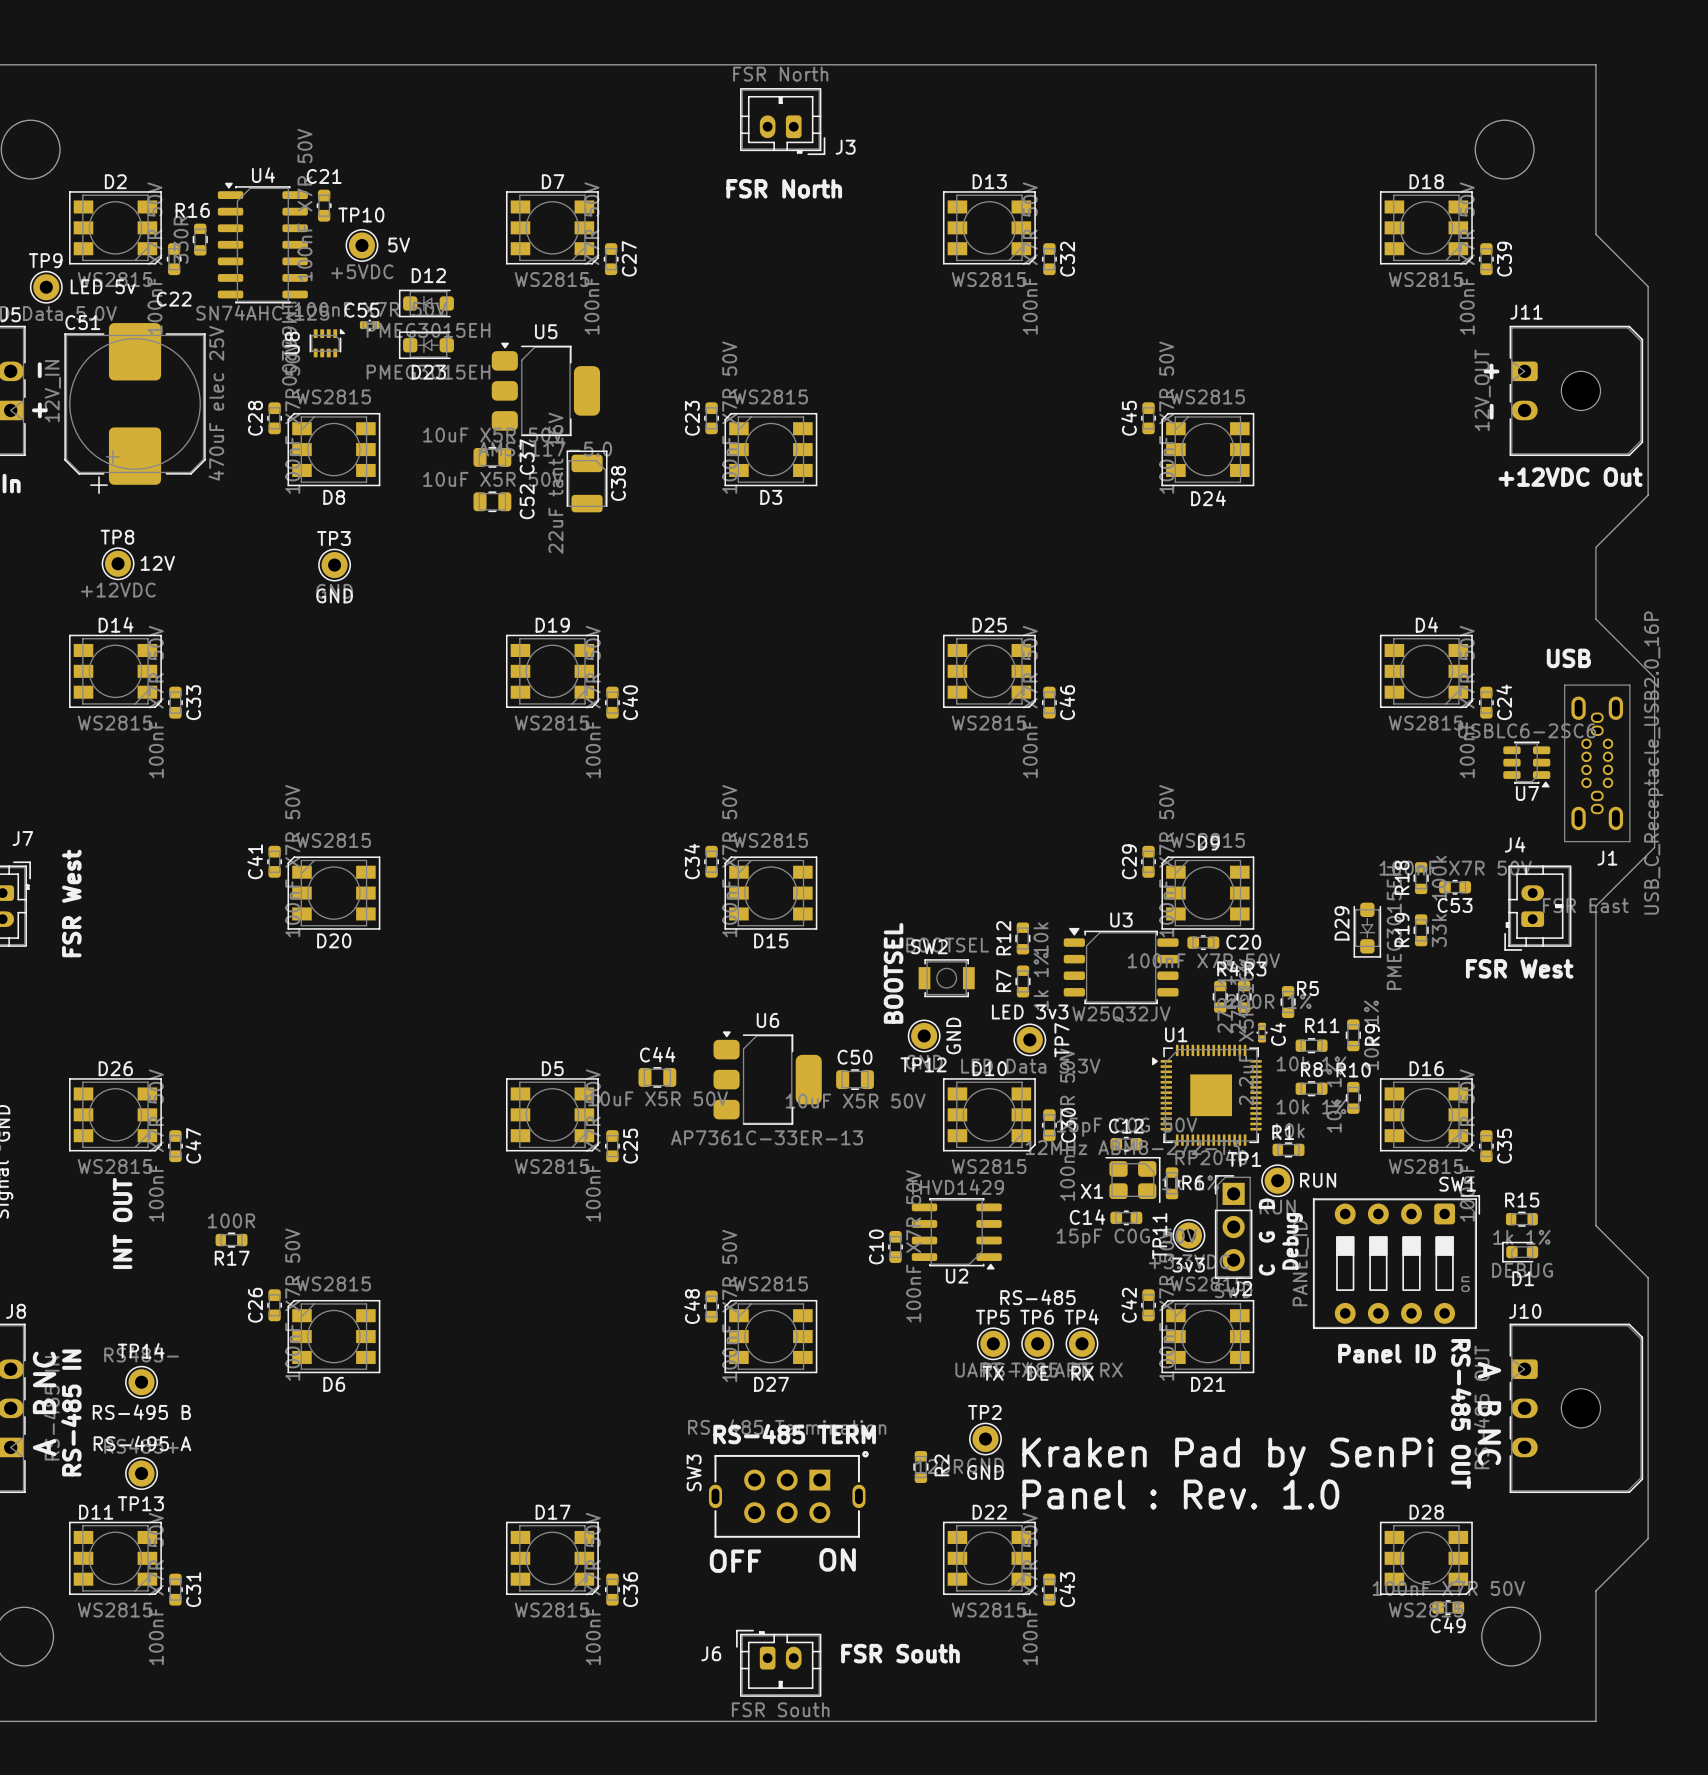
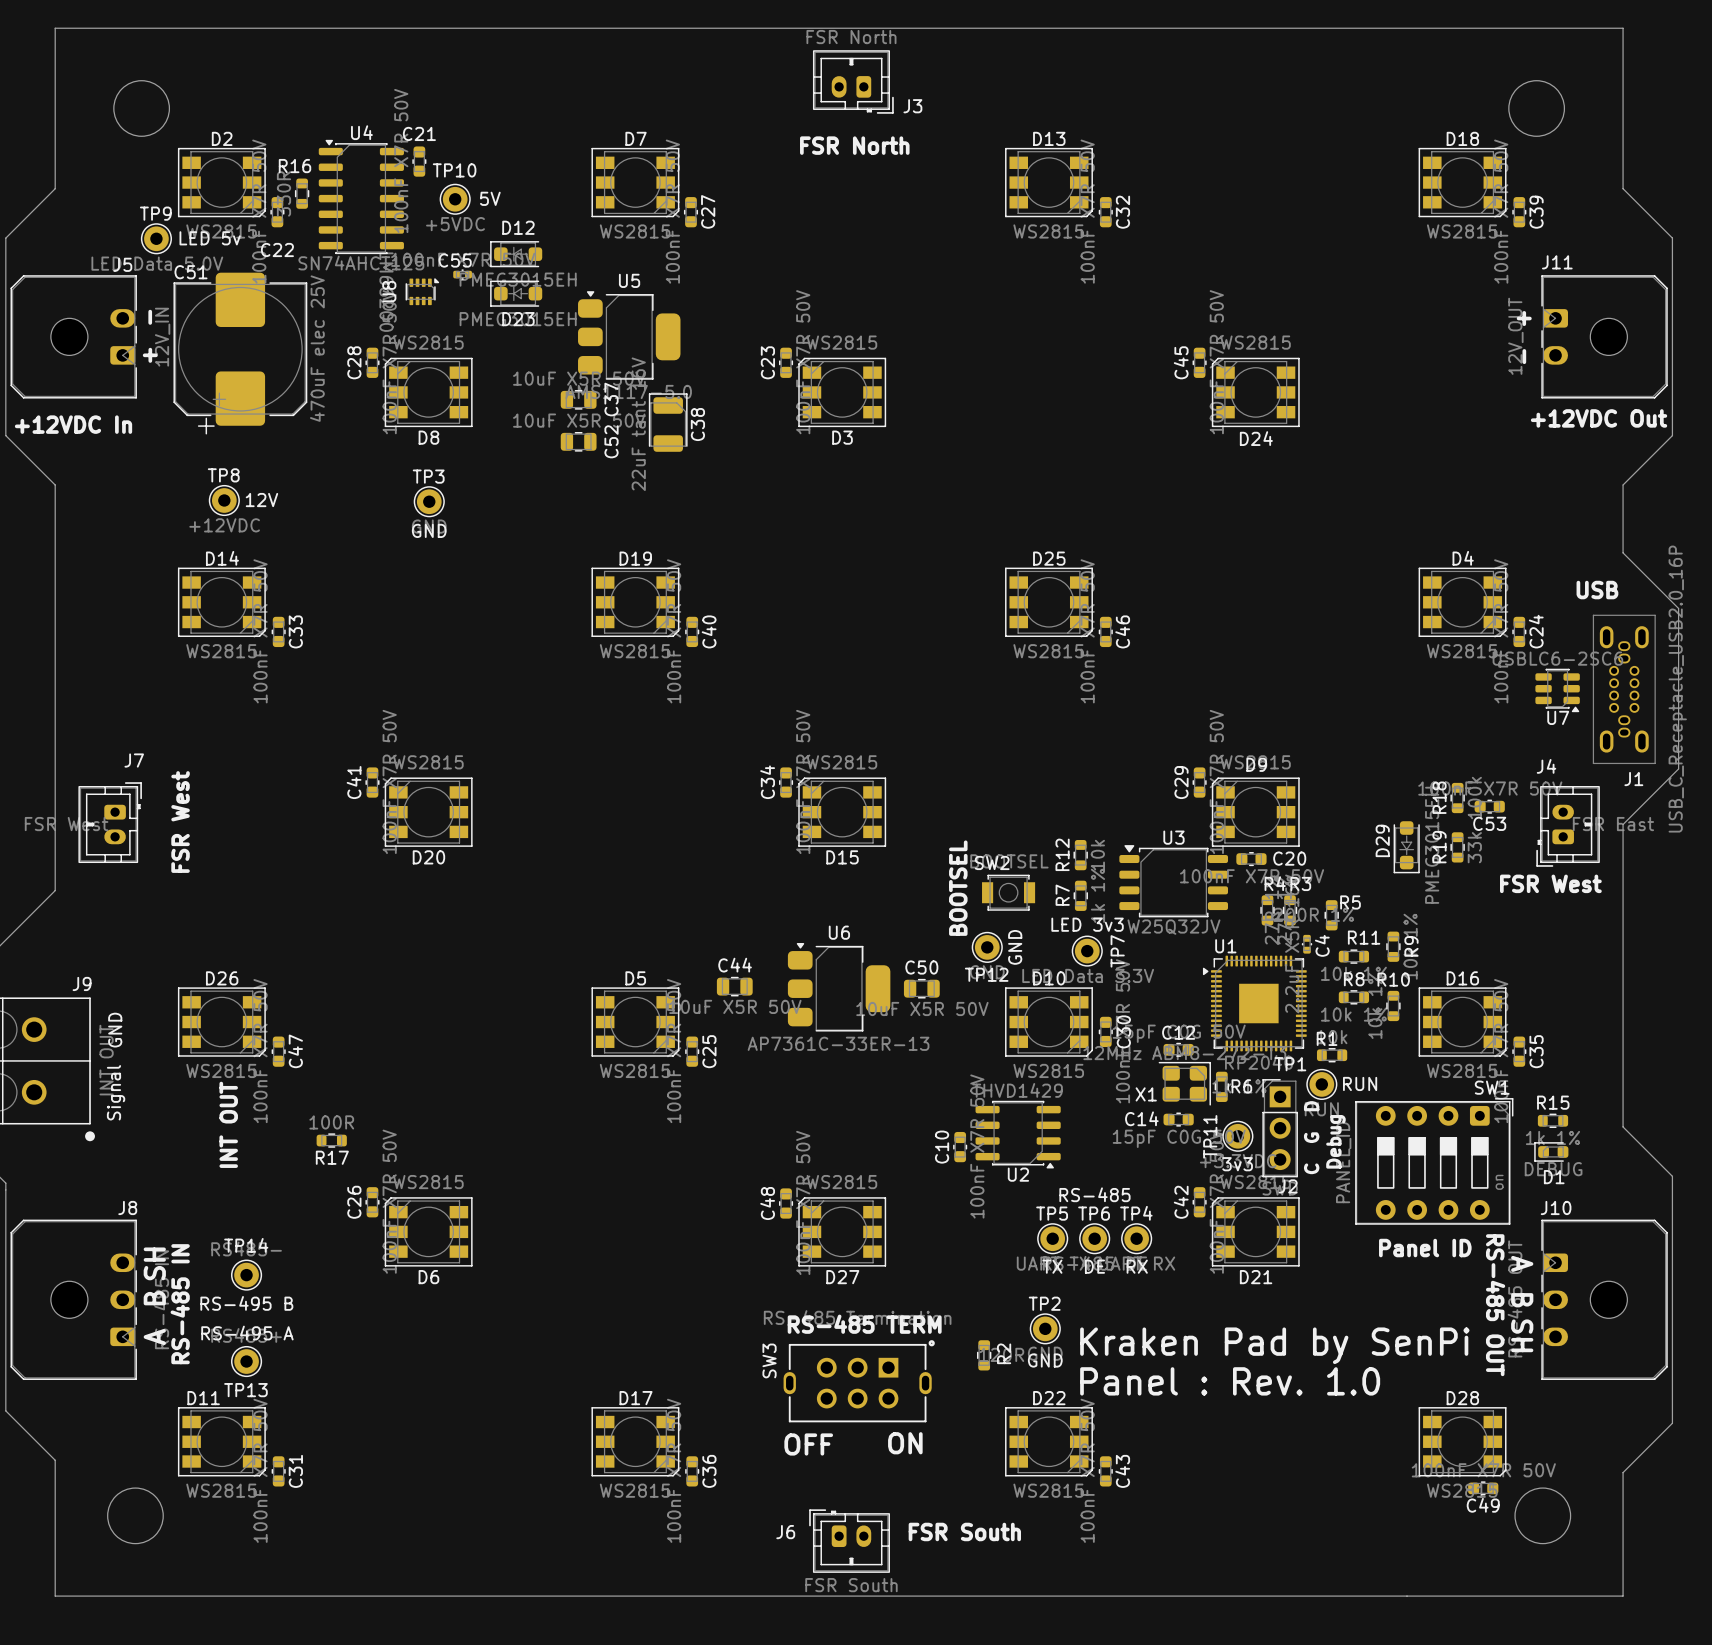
text: NC (44, 1369) -> SH (154, 1263)
text: NC (1489, 1447) -> SH (1522, 1335)

